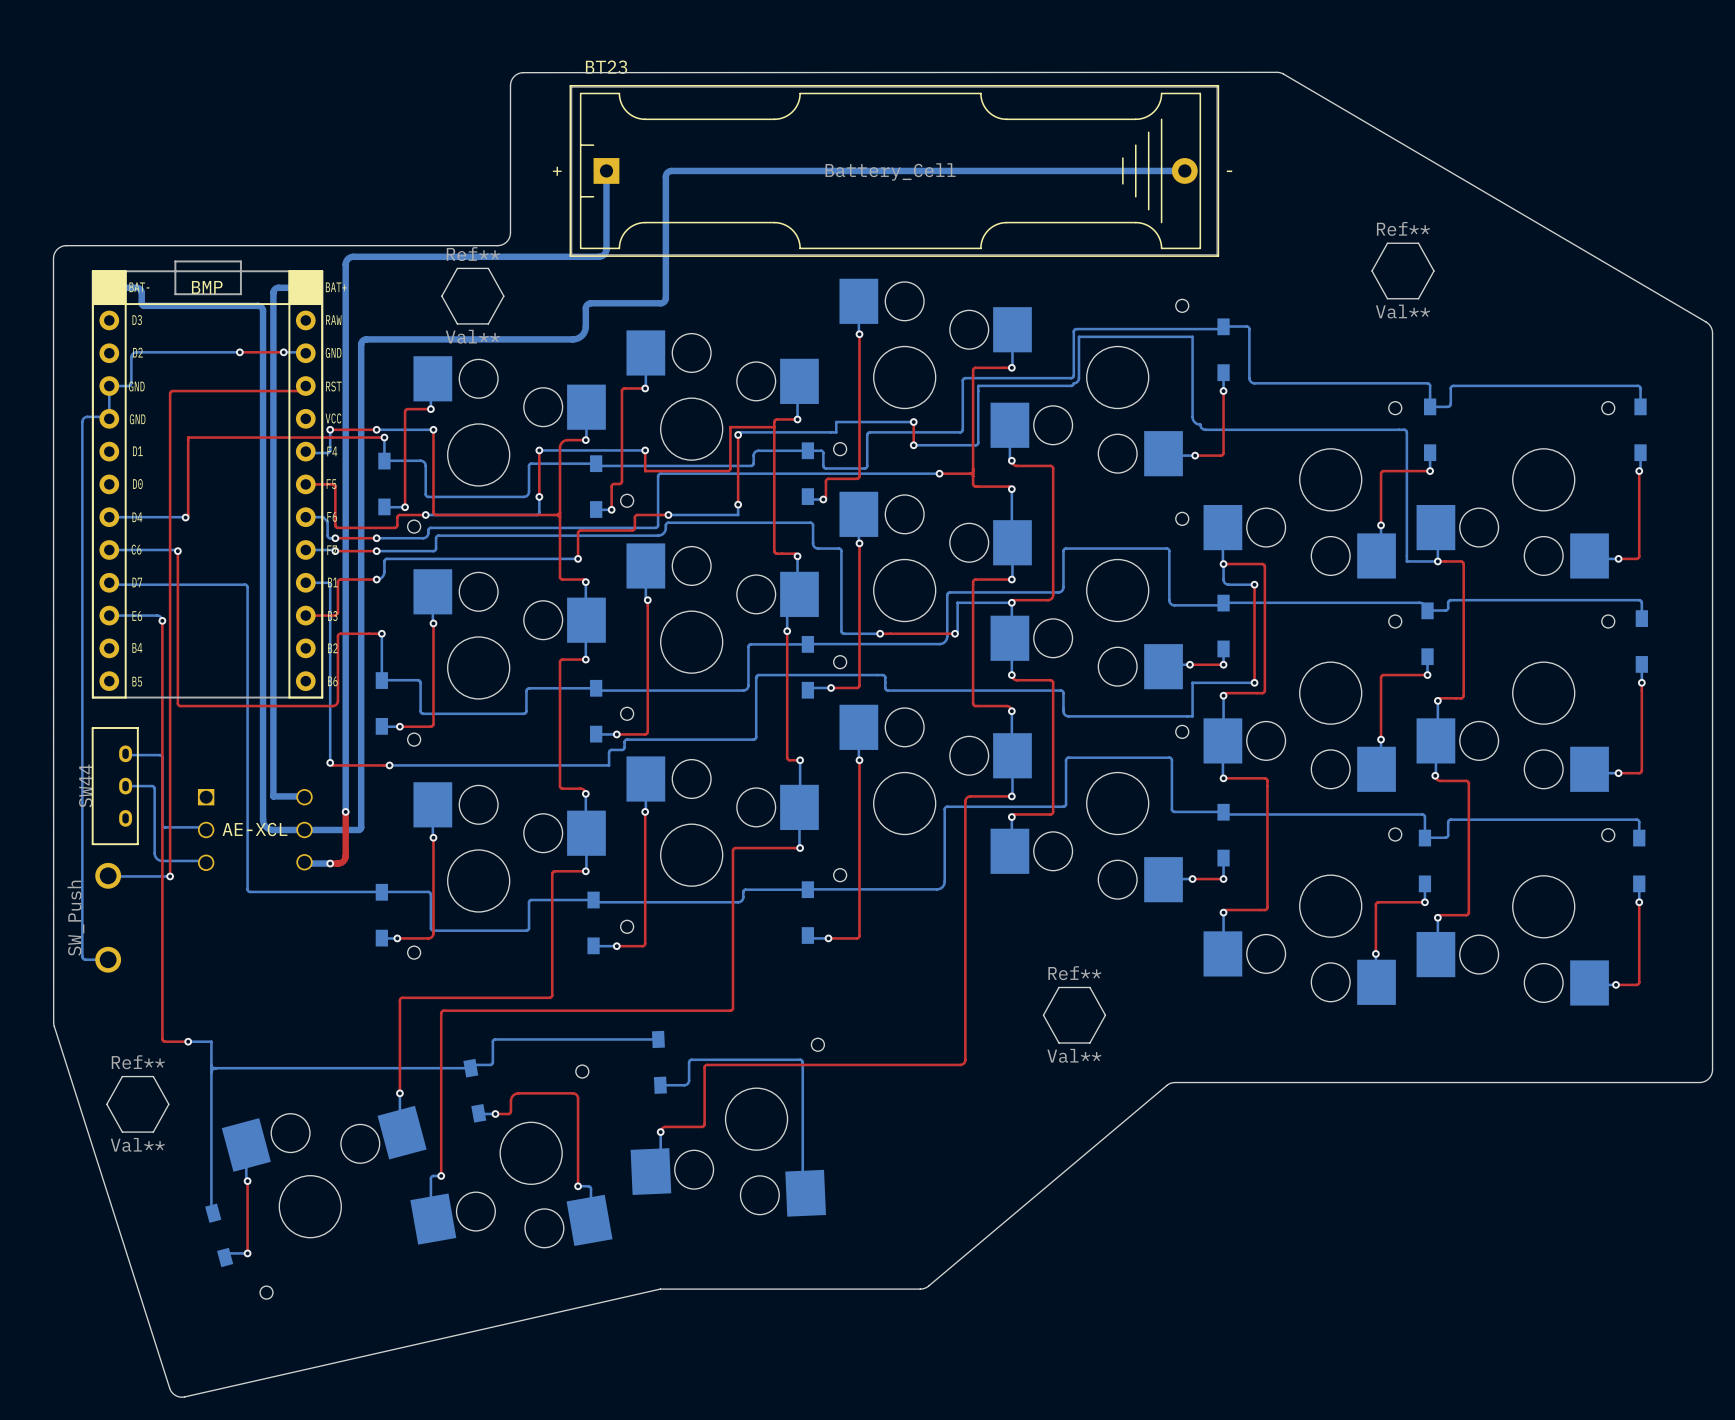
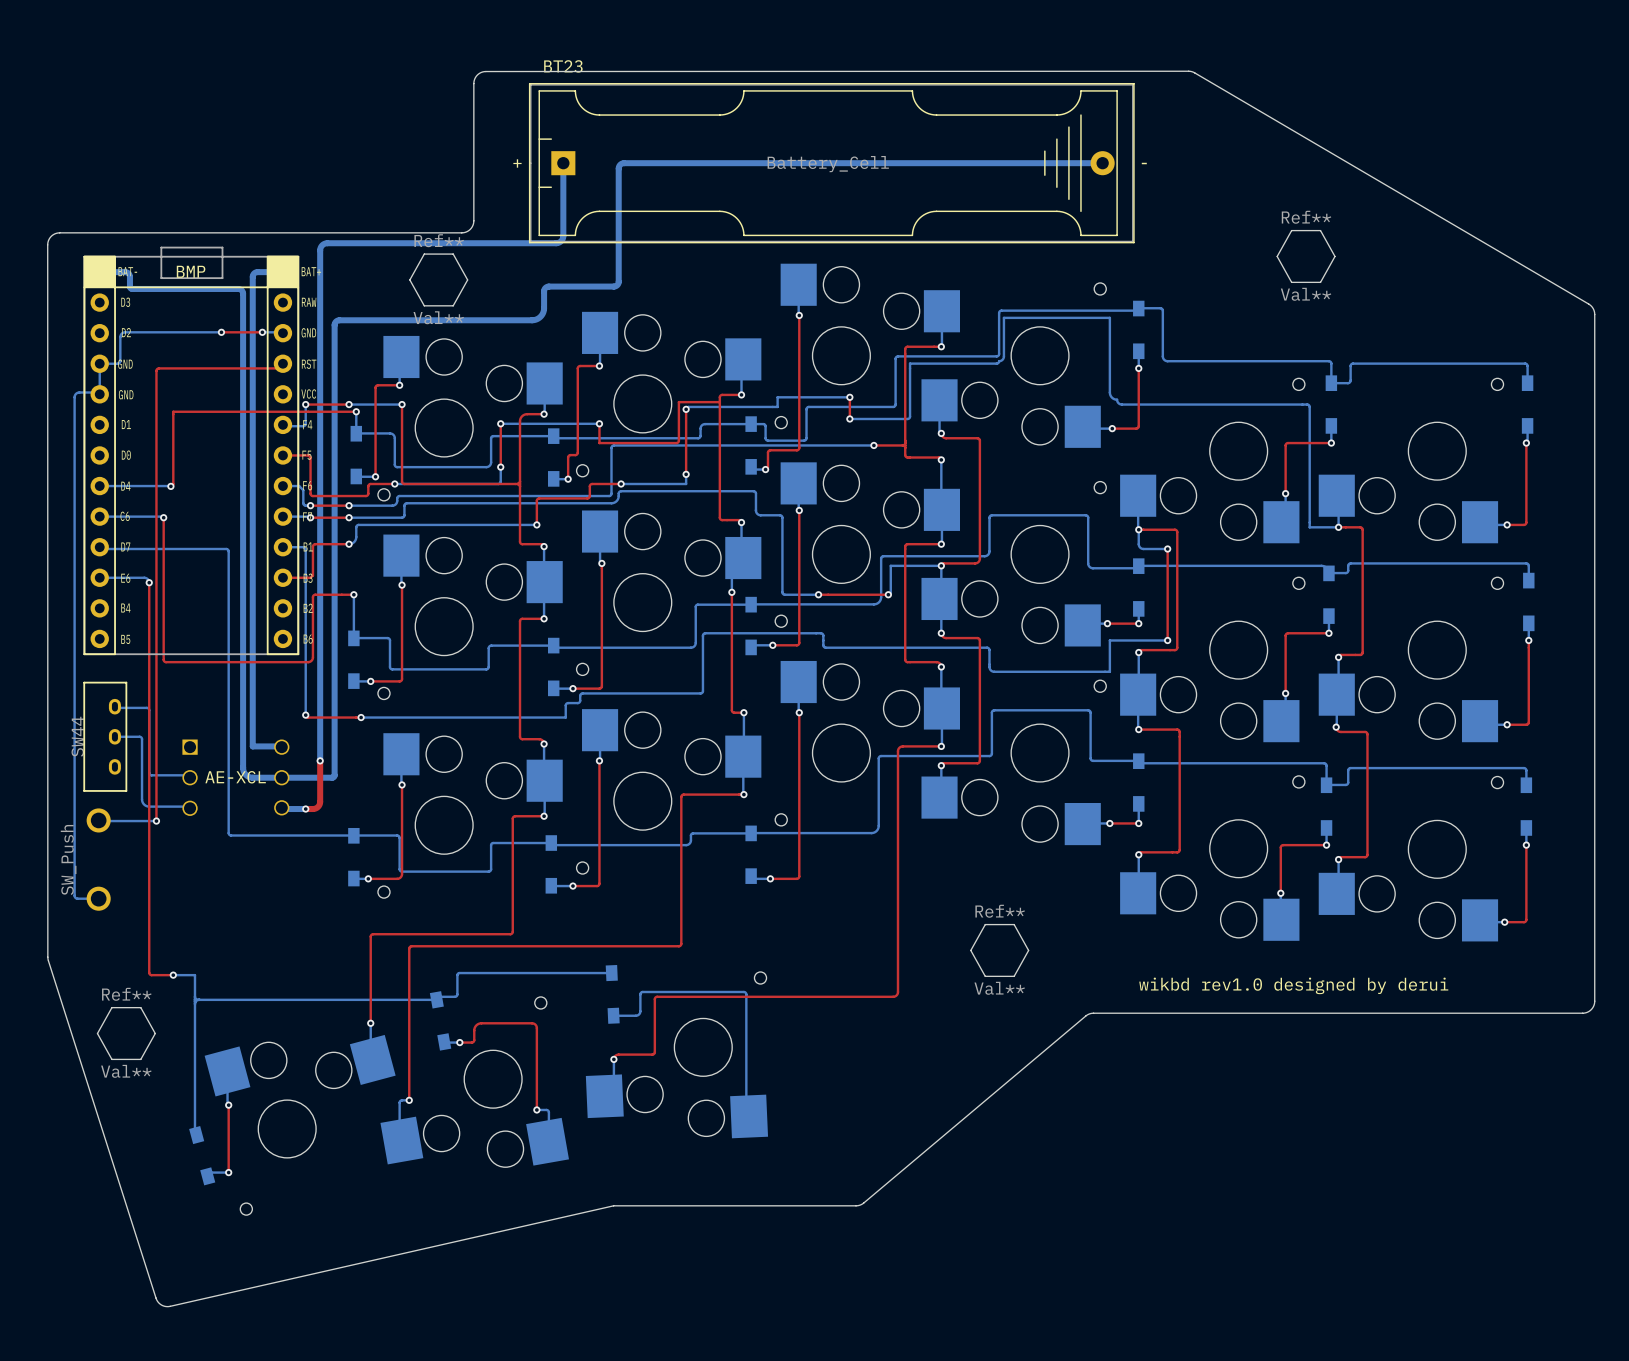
text: none -> wikbd rev1.0 designed by derui (1293, 985)

